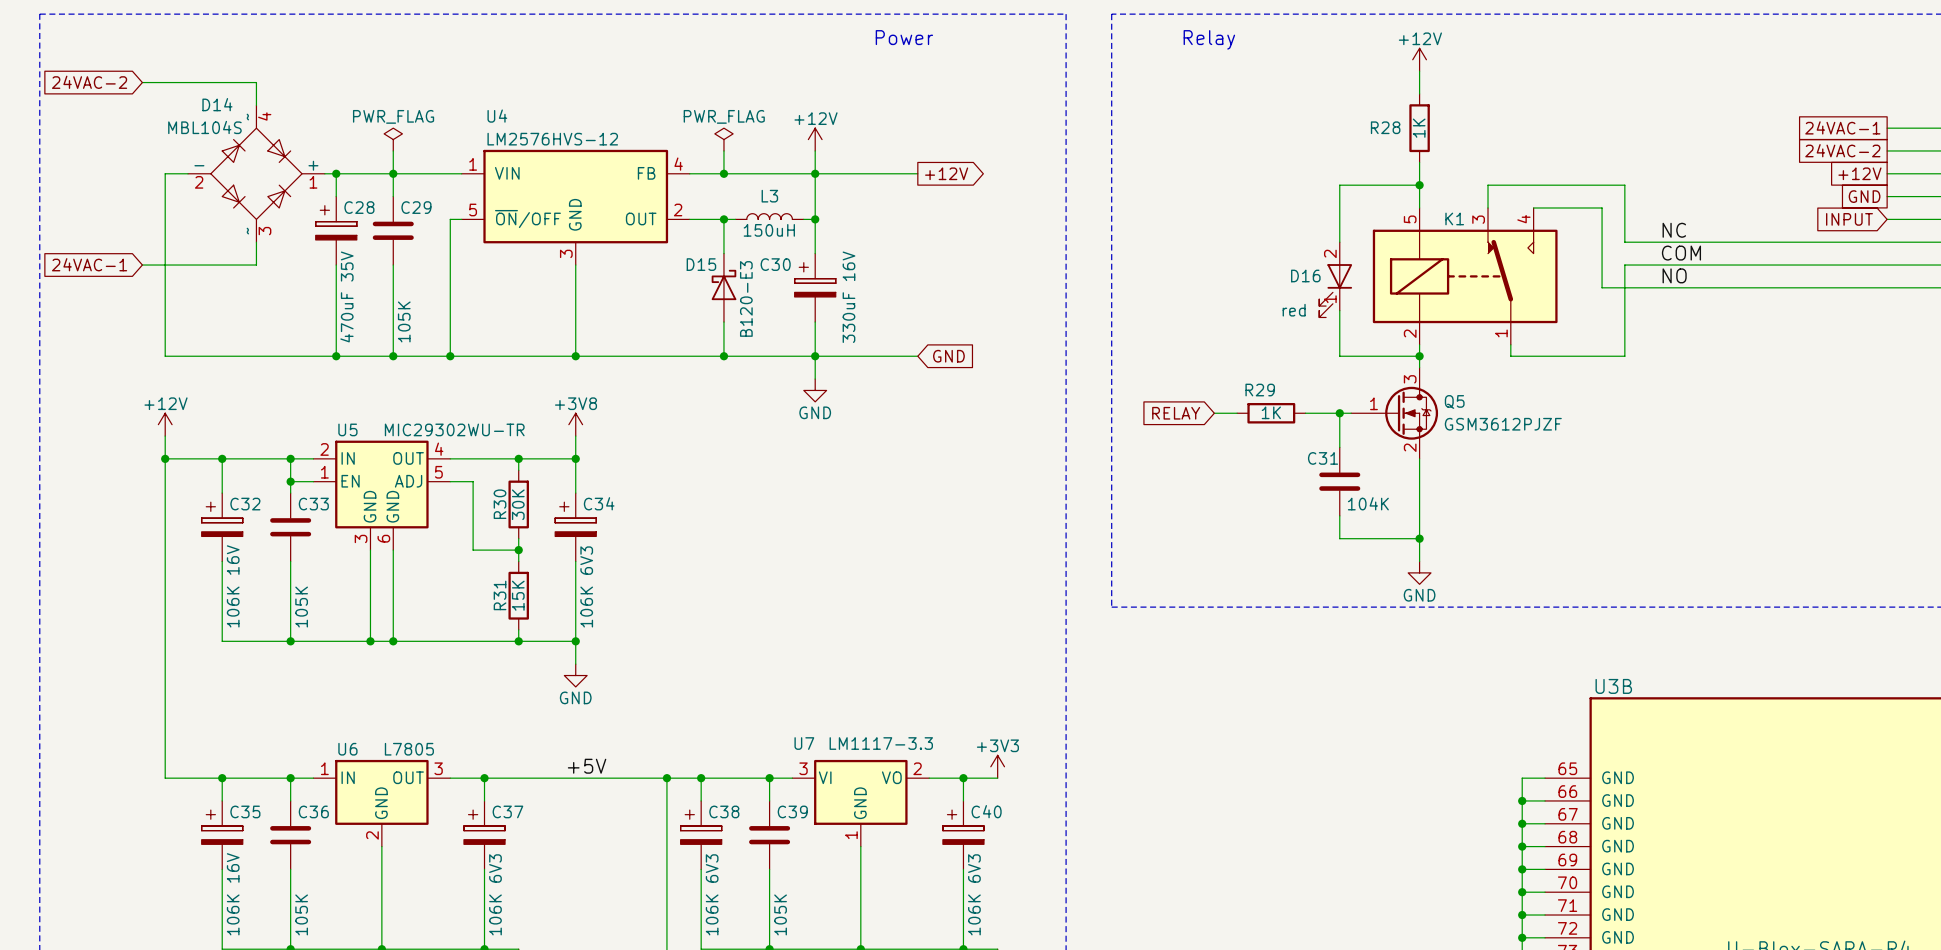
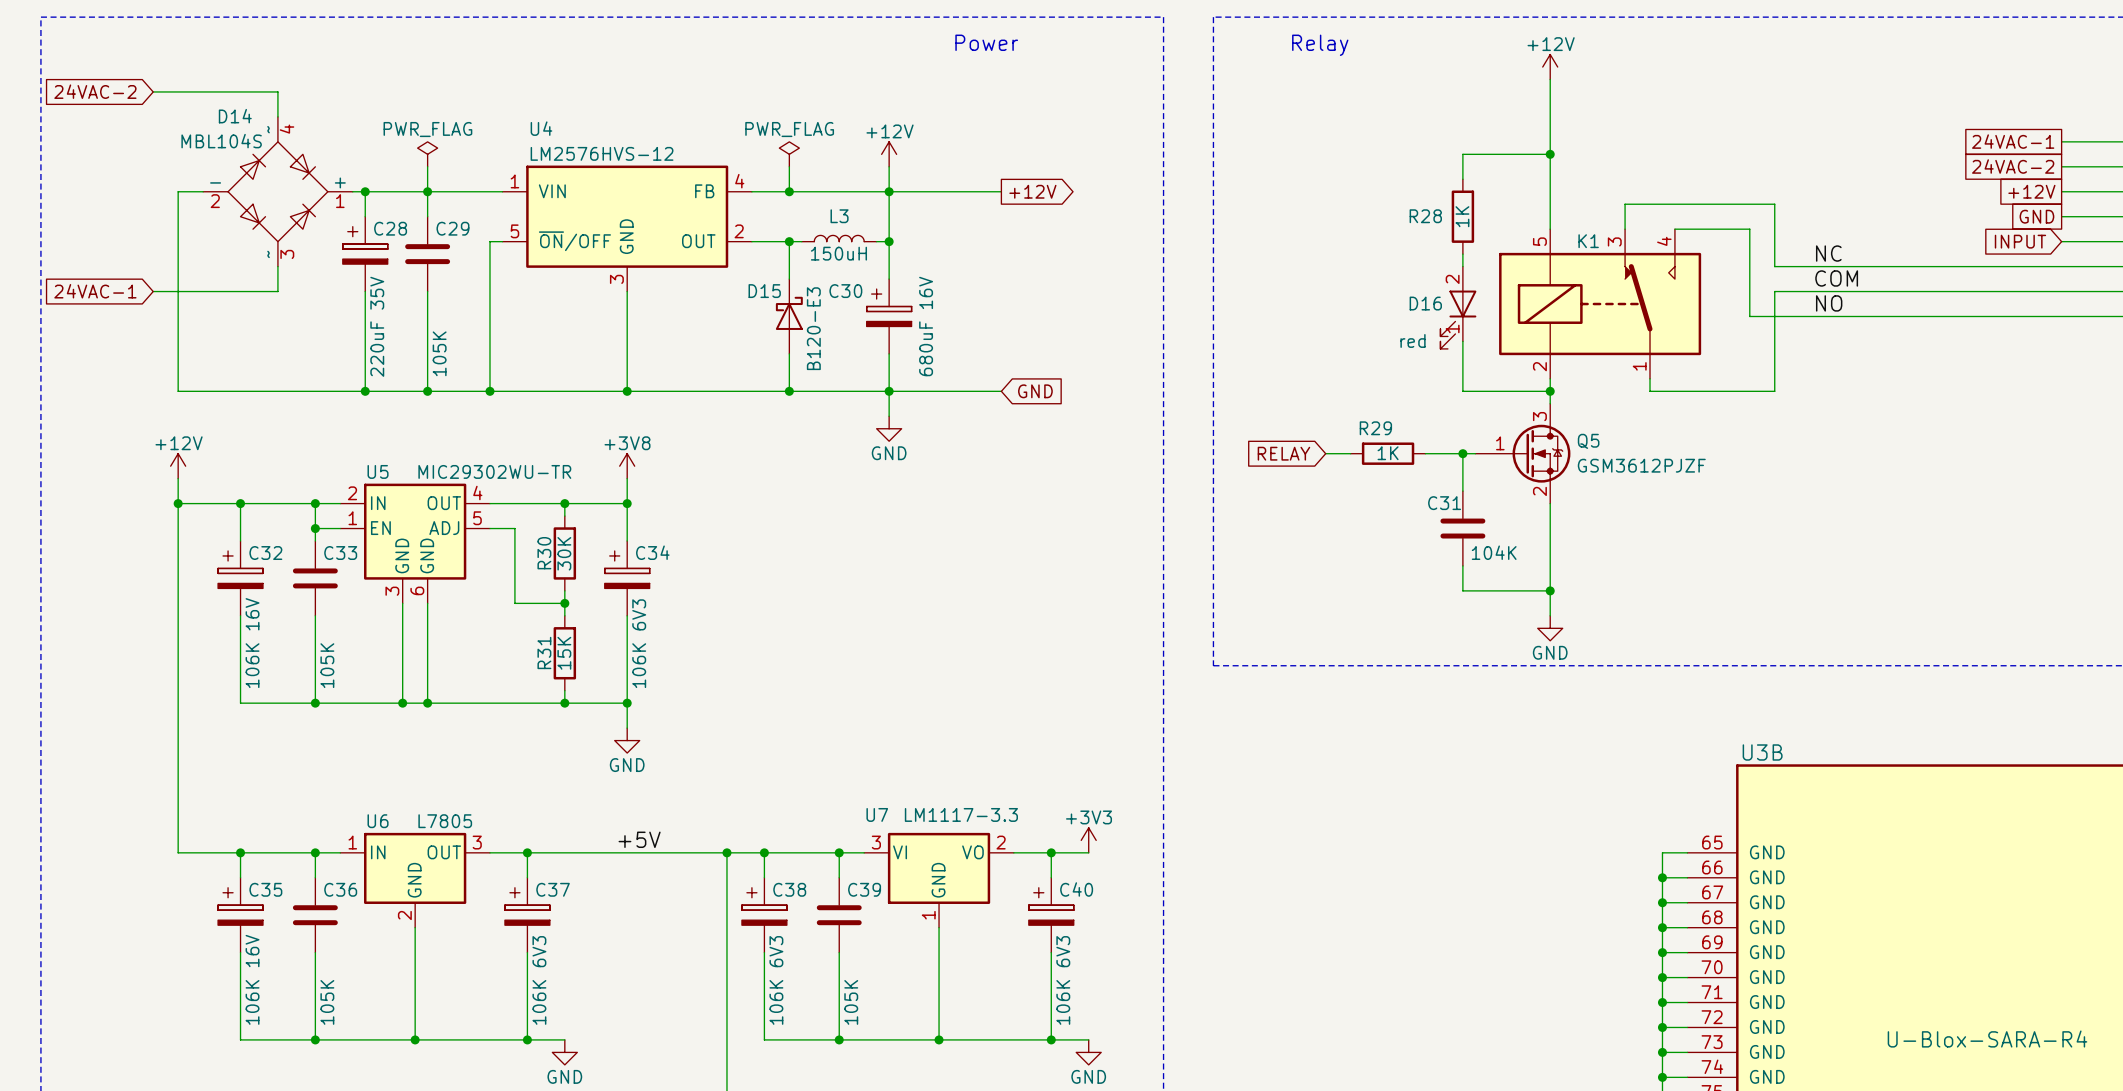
wire: none -> (1550, 104) (1550, 179)
R28 position: (1419, 128) -> (1462, 216)
wire: none -> (1550, 154) (1462, 154) (1462, 179)
wire: (1419, 185) (1339, 185) (1339, 230) -> none
junction position: (1419, 185) -> (1550, 154)
C28 value: 470uF 35V (346, 296) -> 220uF 35V (377, 326)
C30 value: 330uF 16V (848, 297) -> 680uF 16V (926, 326)

